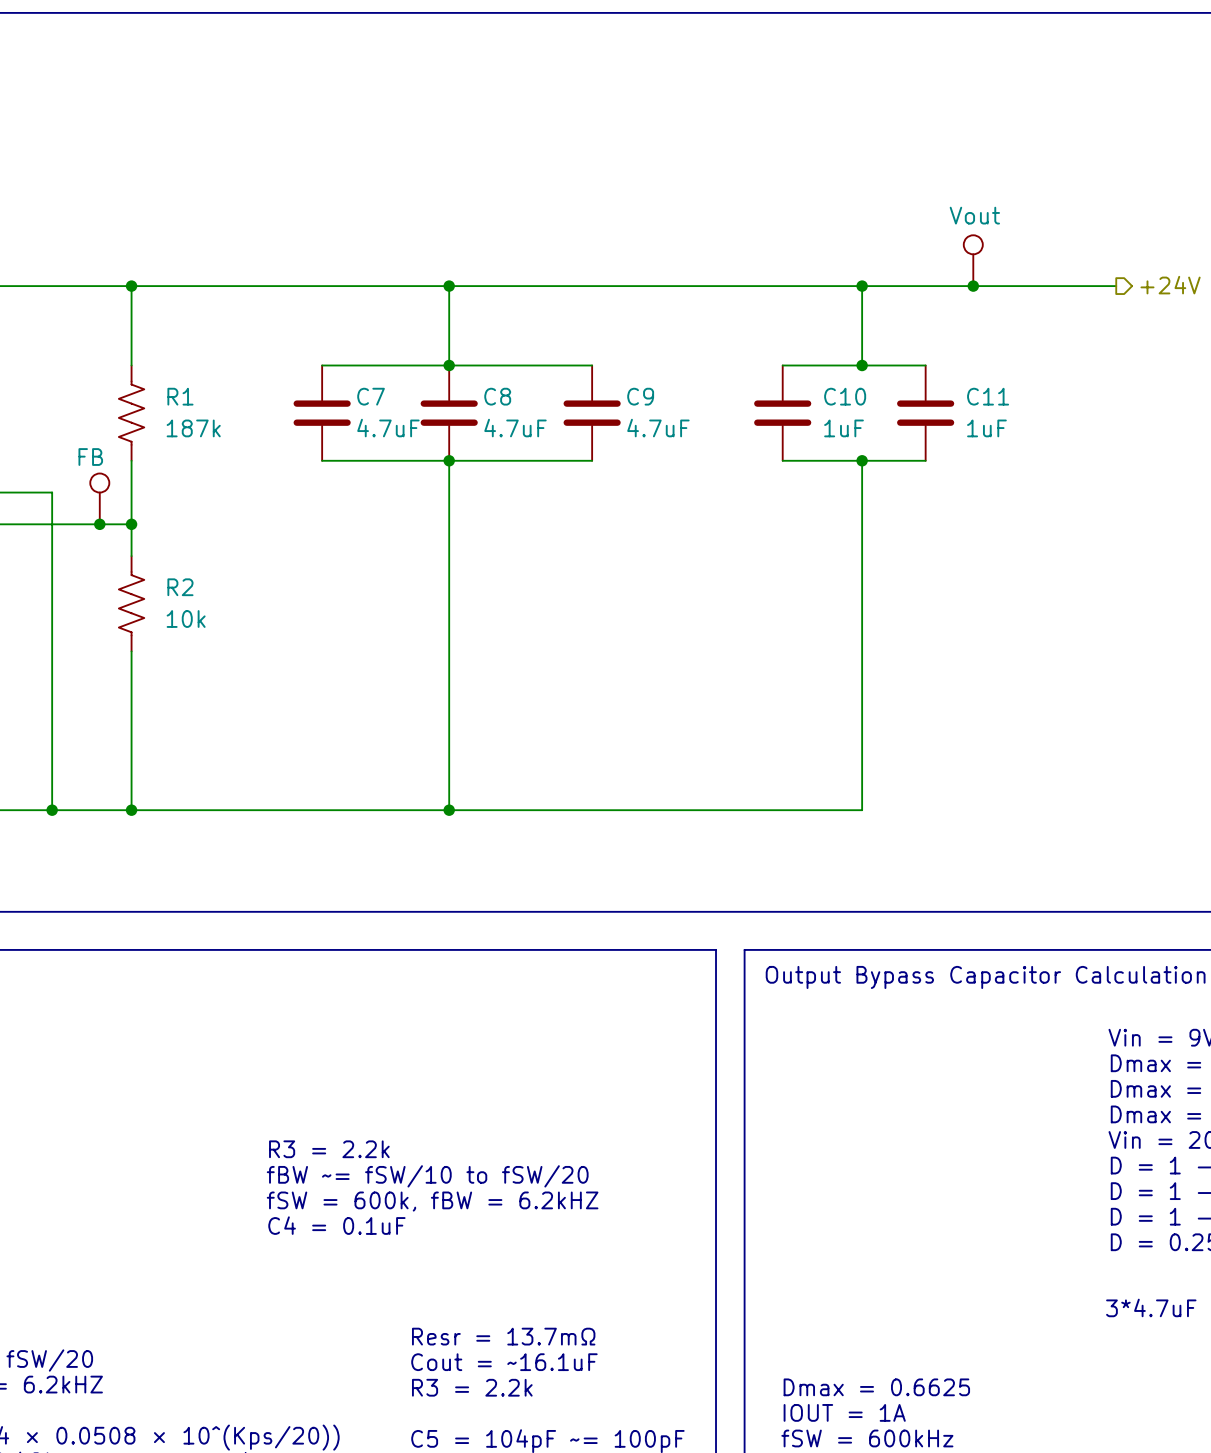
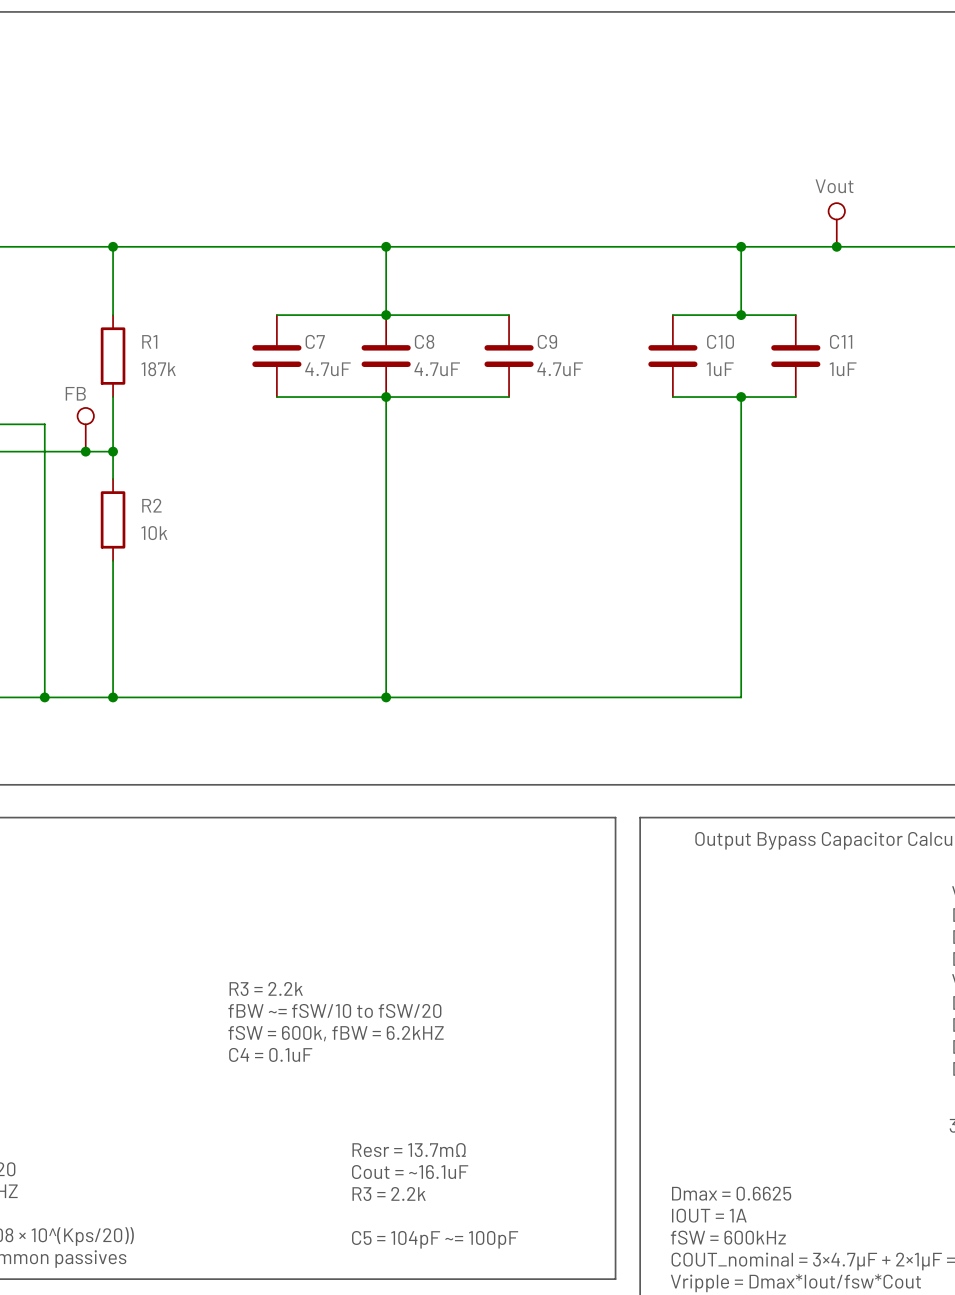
R1 symbol: [118, 365, 145, 461] -> [100, 315, 126, 398]
R2 symbol: [118, 556, 145, 652] -> [100, 478, 126, 561]

